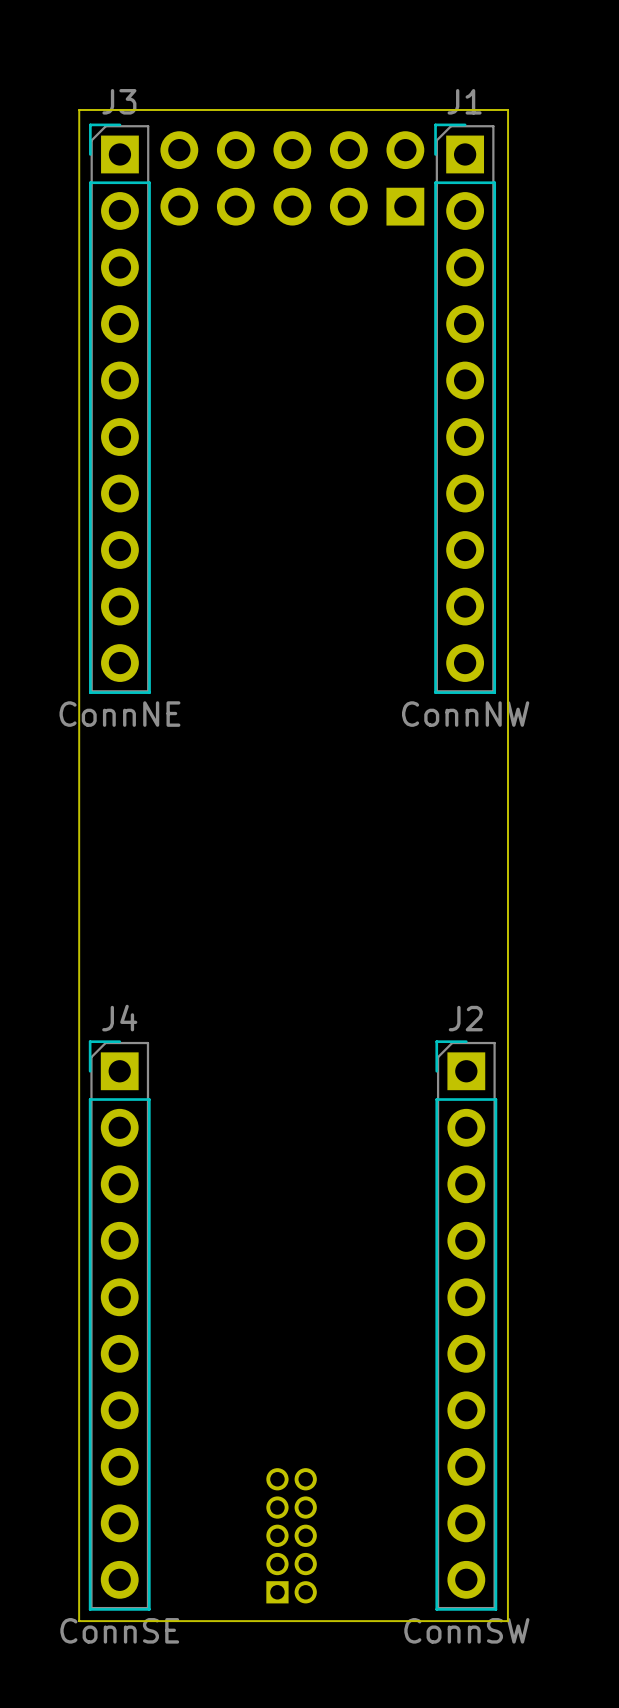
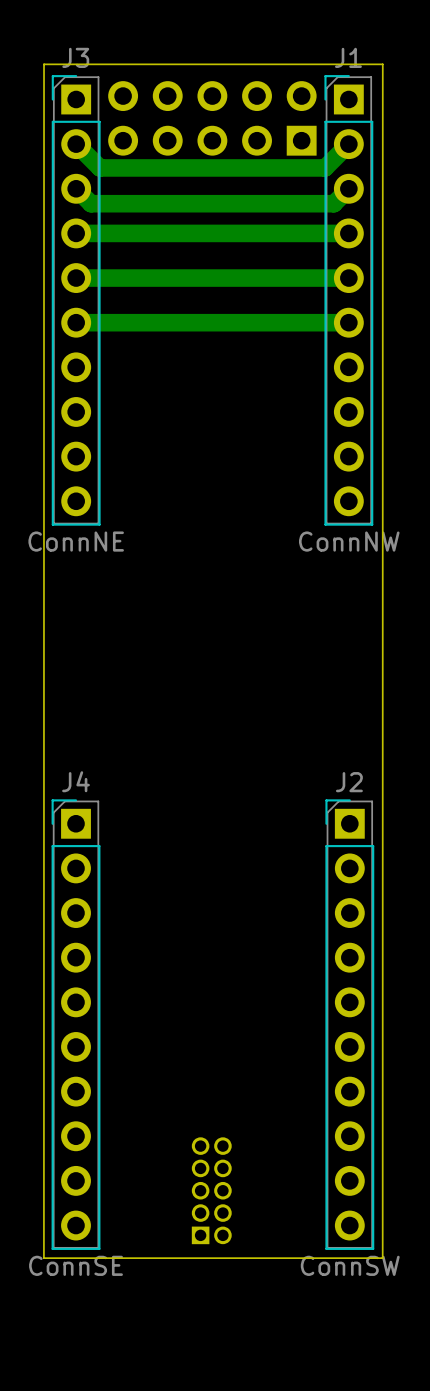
track: none -> (348, 144) (325, 167) (99, 167) (76, 144)
track: none -> (348, 188) (333, 203) (91, 203) (76, 188)
track: none -> (348, 233) (76, 233)
track: none -> (348, 278) (76, 278)
track: none -> (348, 322) (76, 322)

